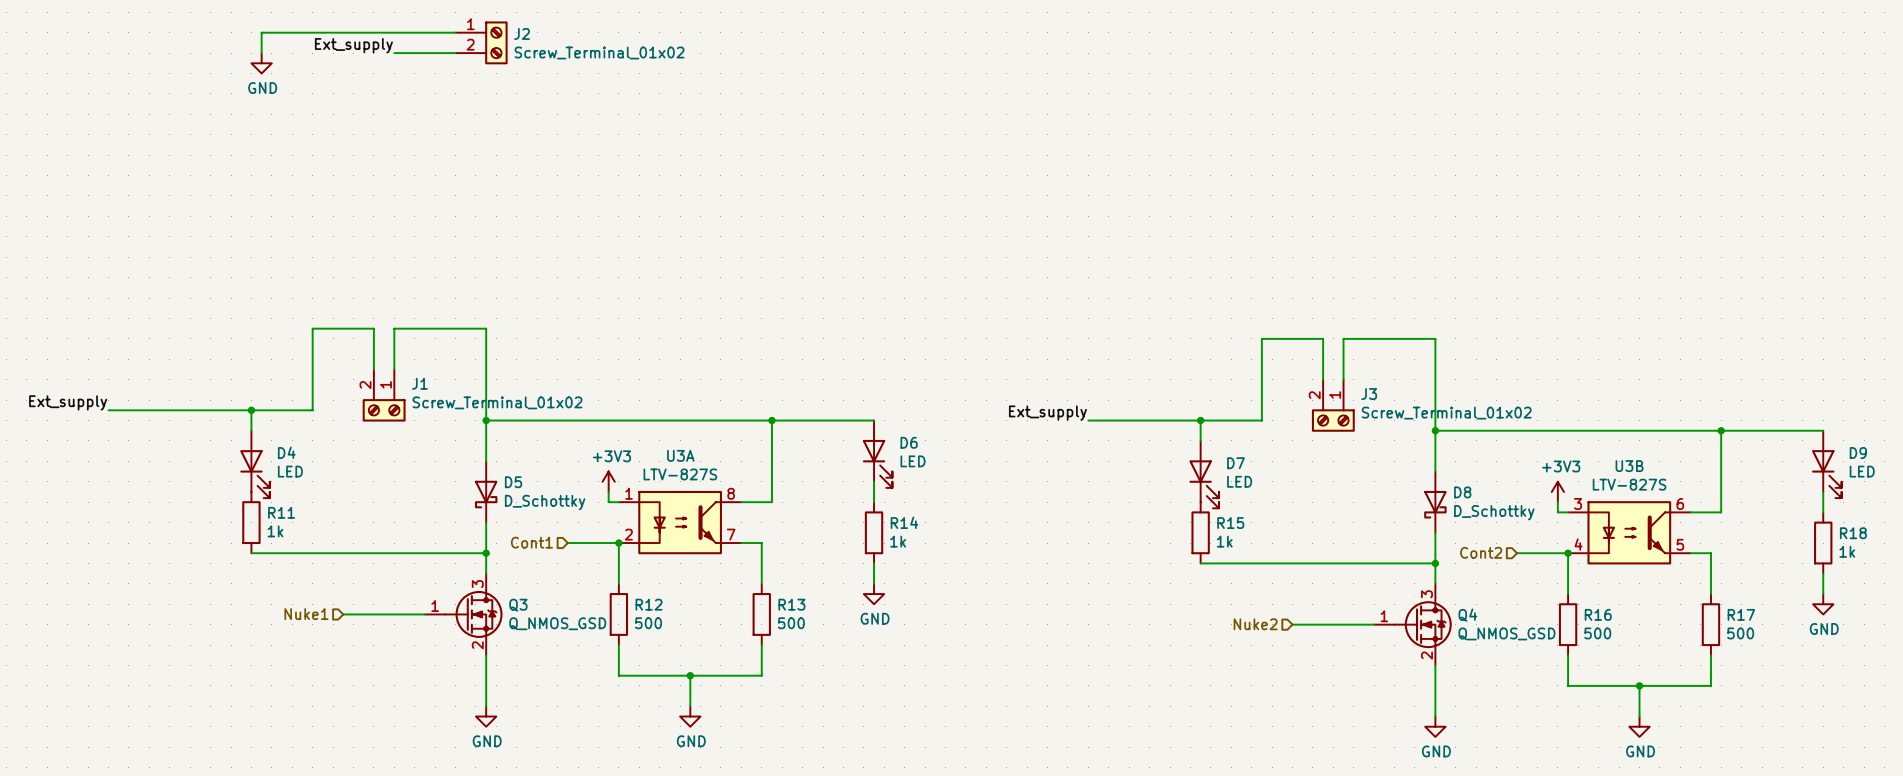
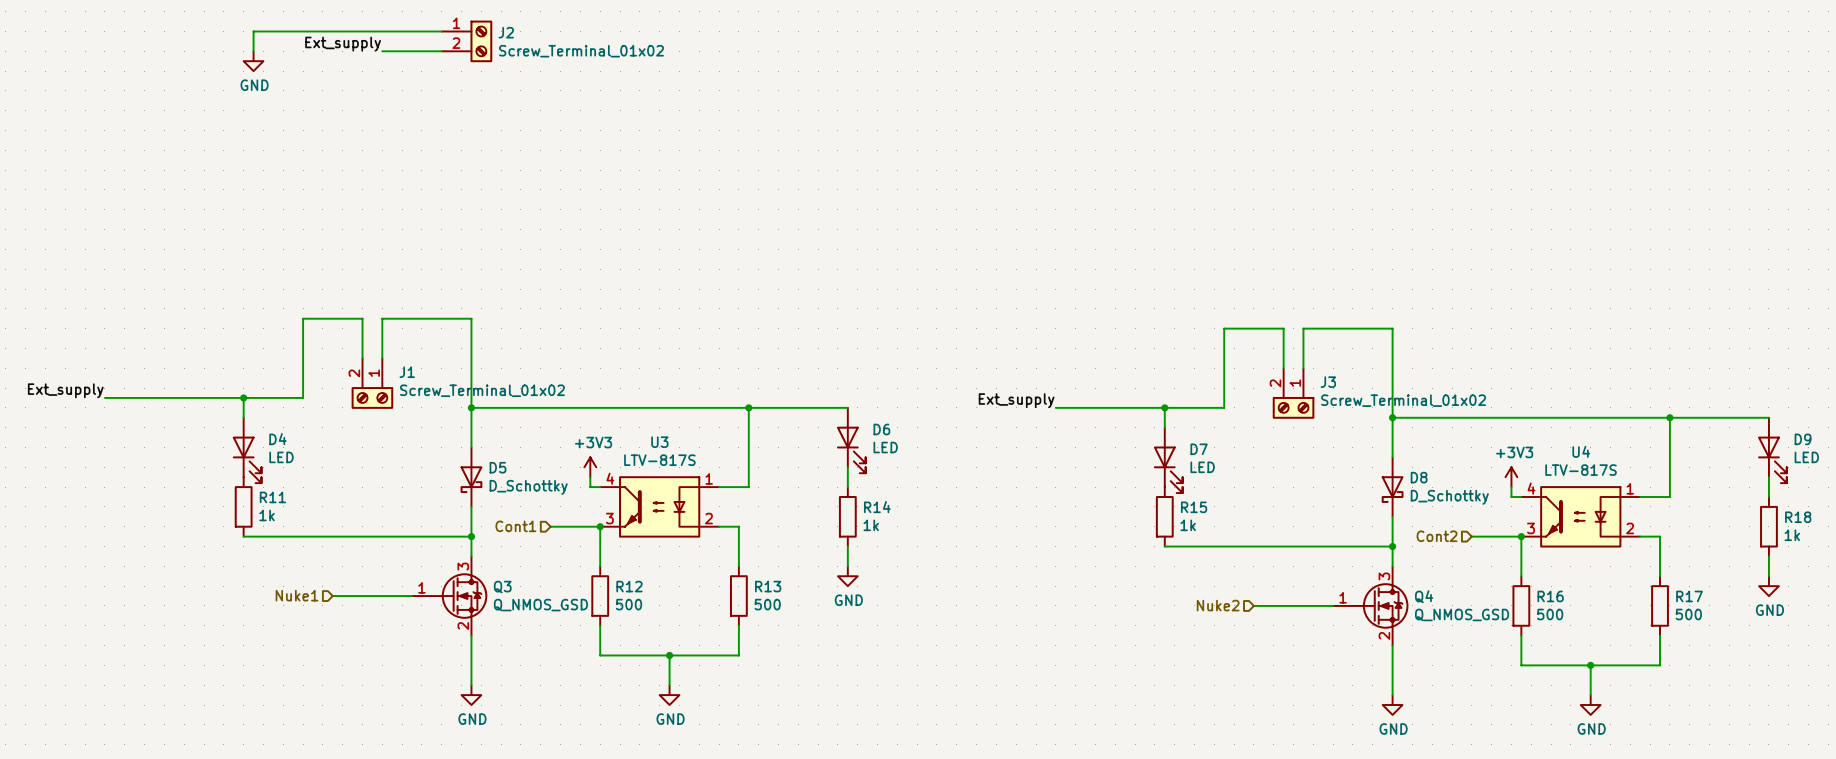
U3A: LTV-827S (680, 522) -> none
U3: none -> LTV-817S (659, 506)
U3B: LTV-827S (1629, 532) -> none
U4: none -> LTV-817S (1580, 516)

